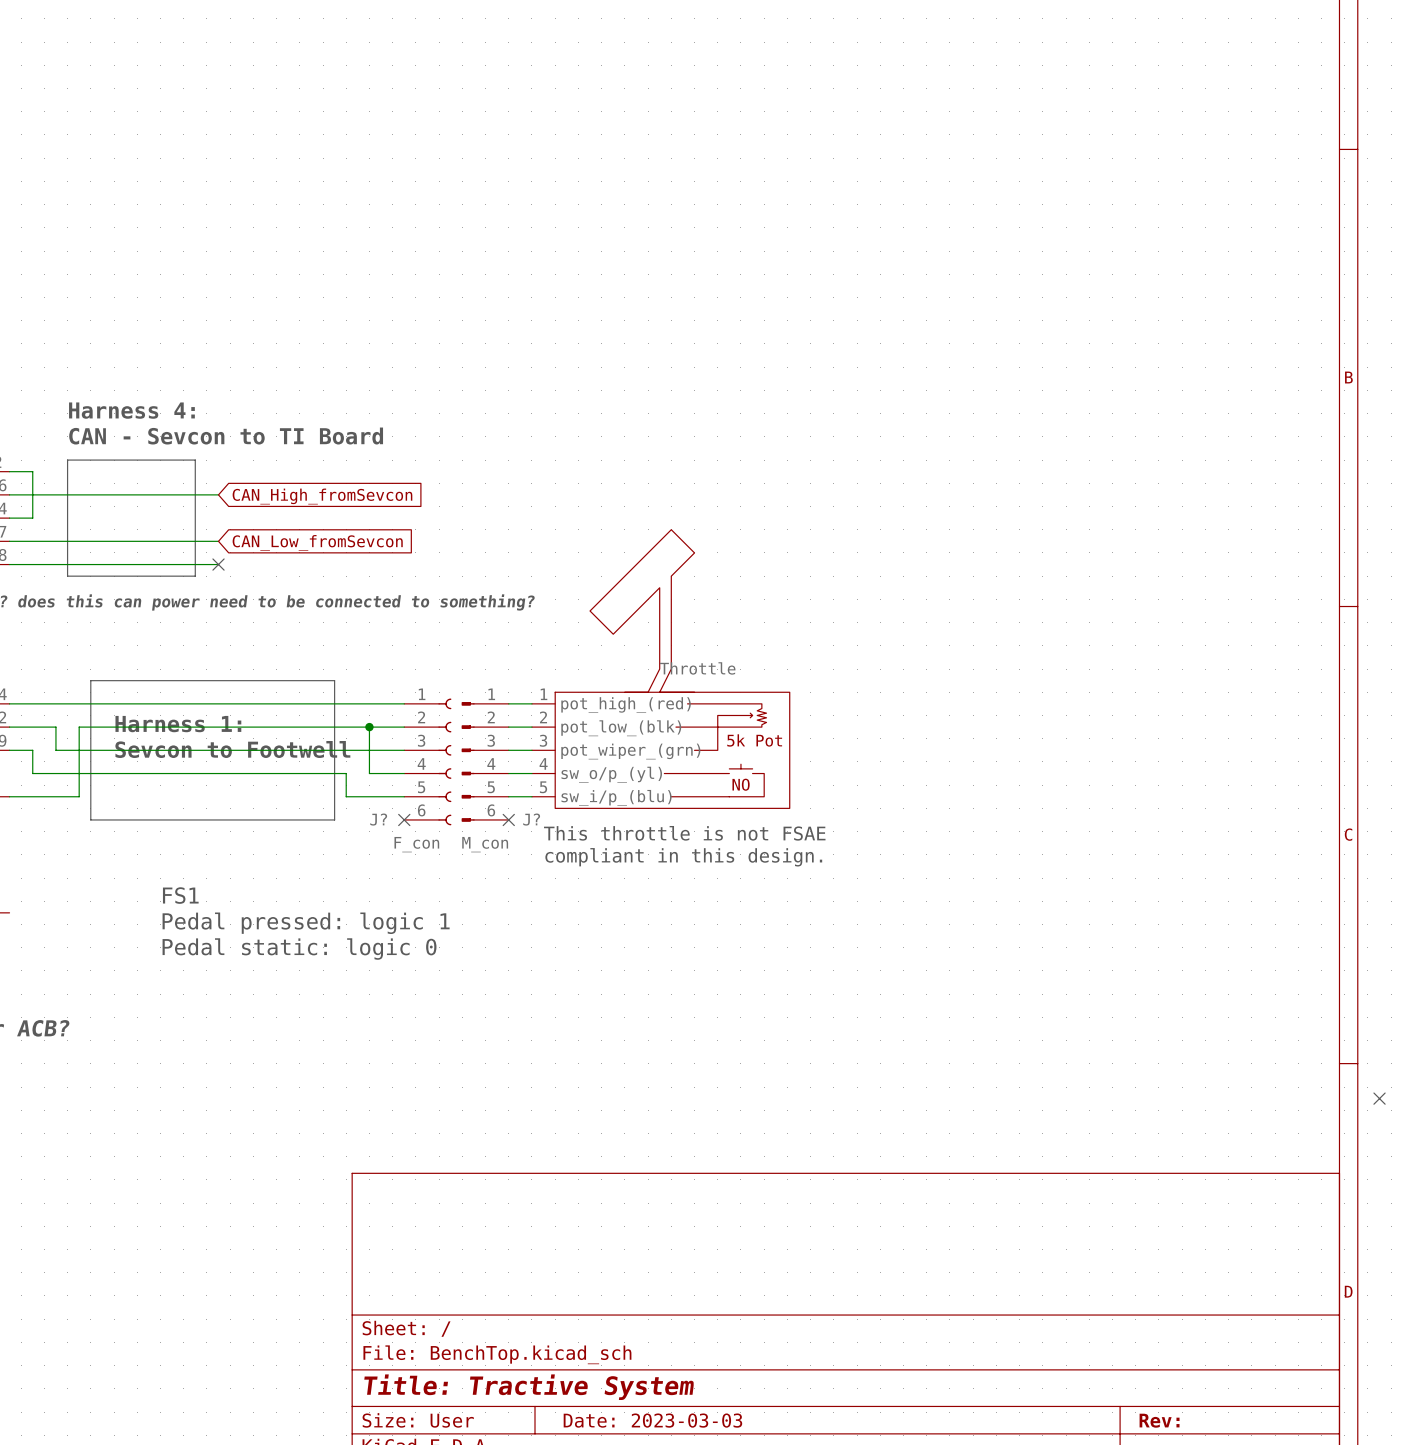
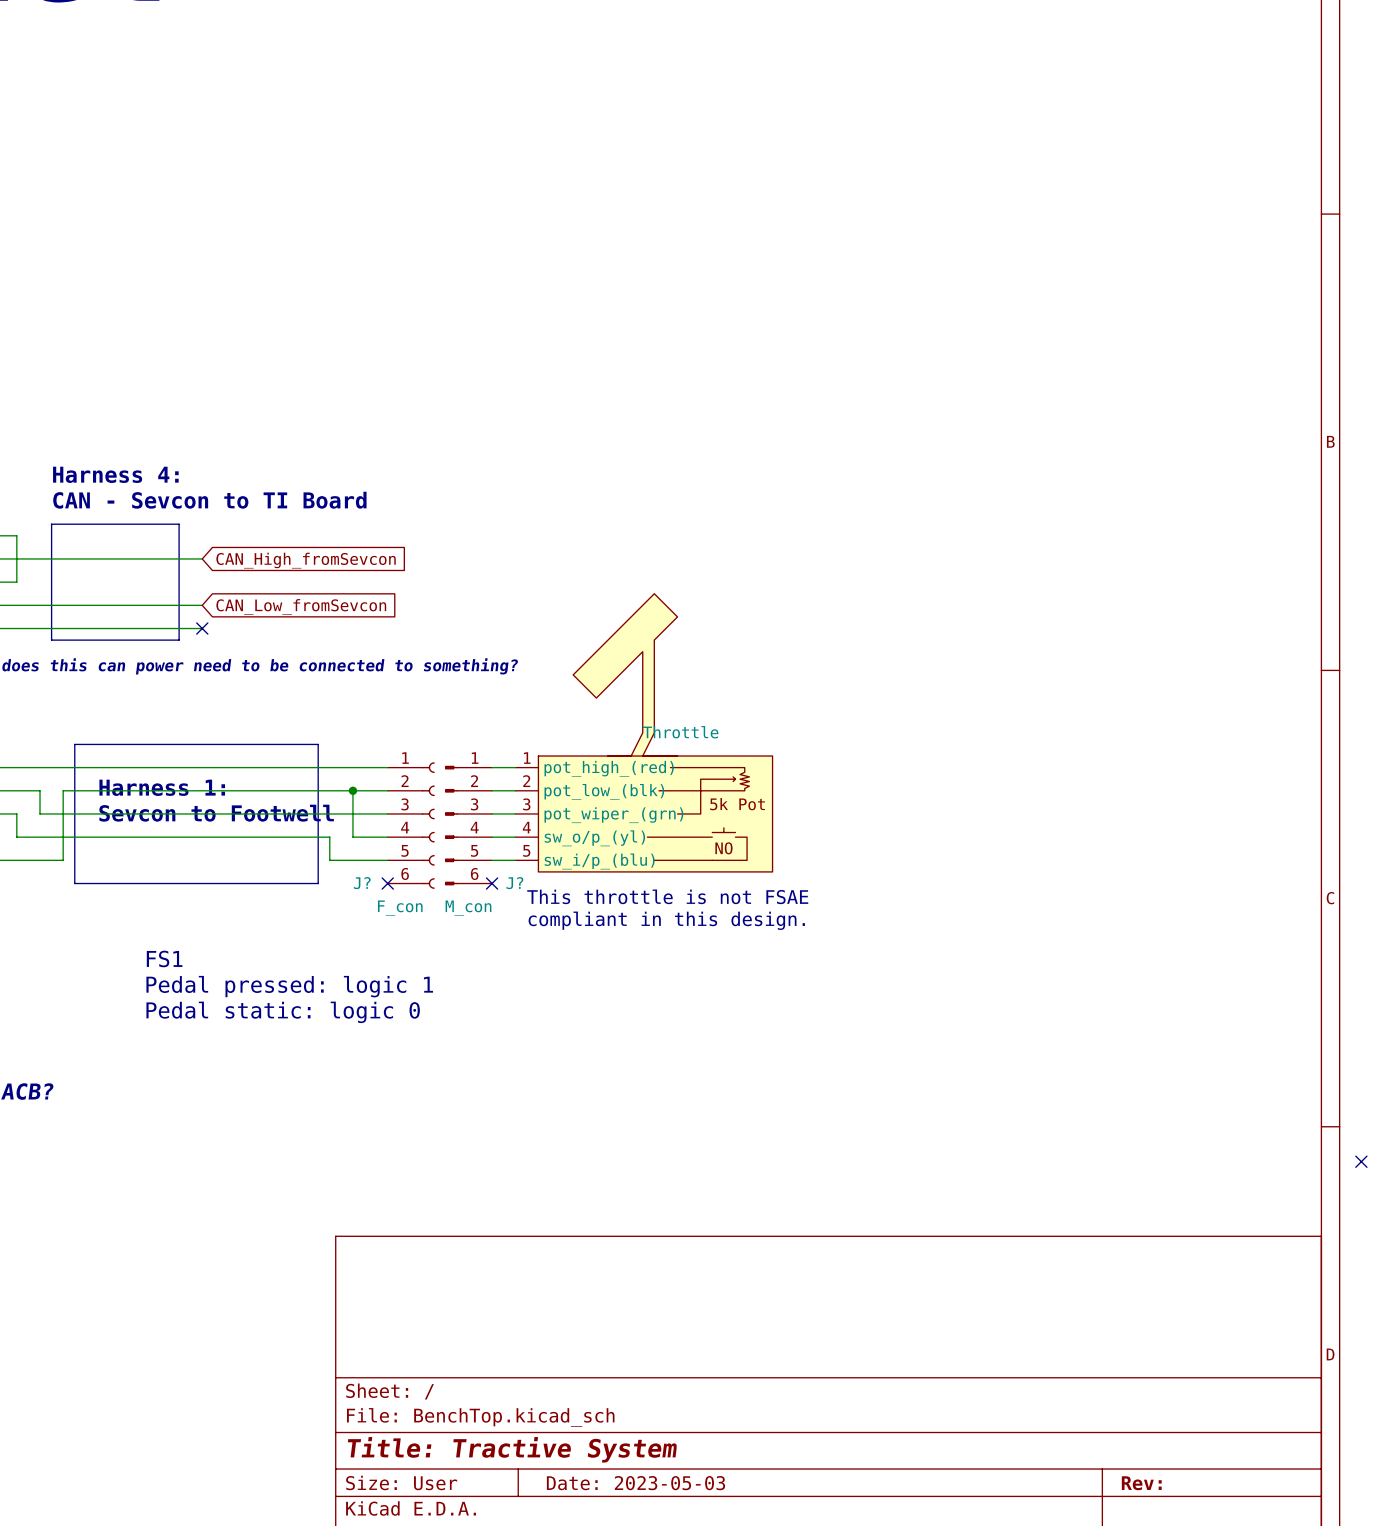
title block: Date: 2023-03-03 (652, 1420) -> Date: 2023-05-03 (635, 1483)

